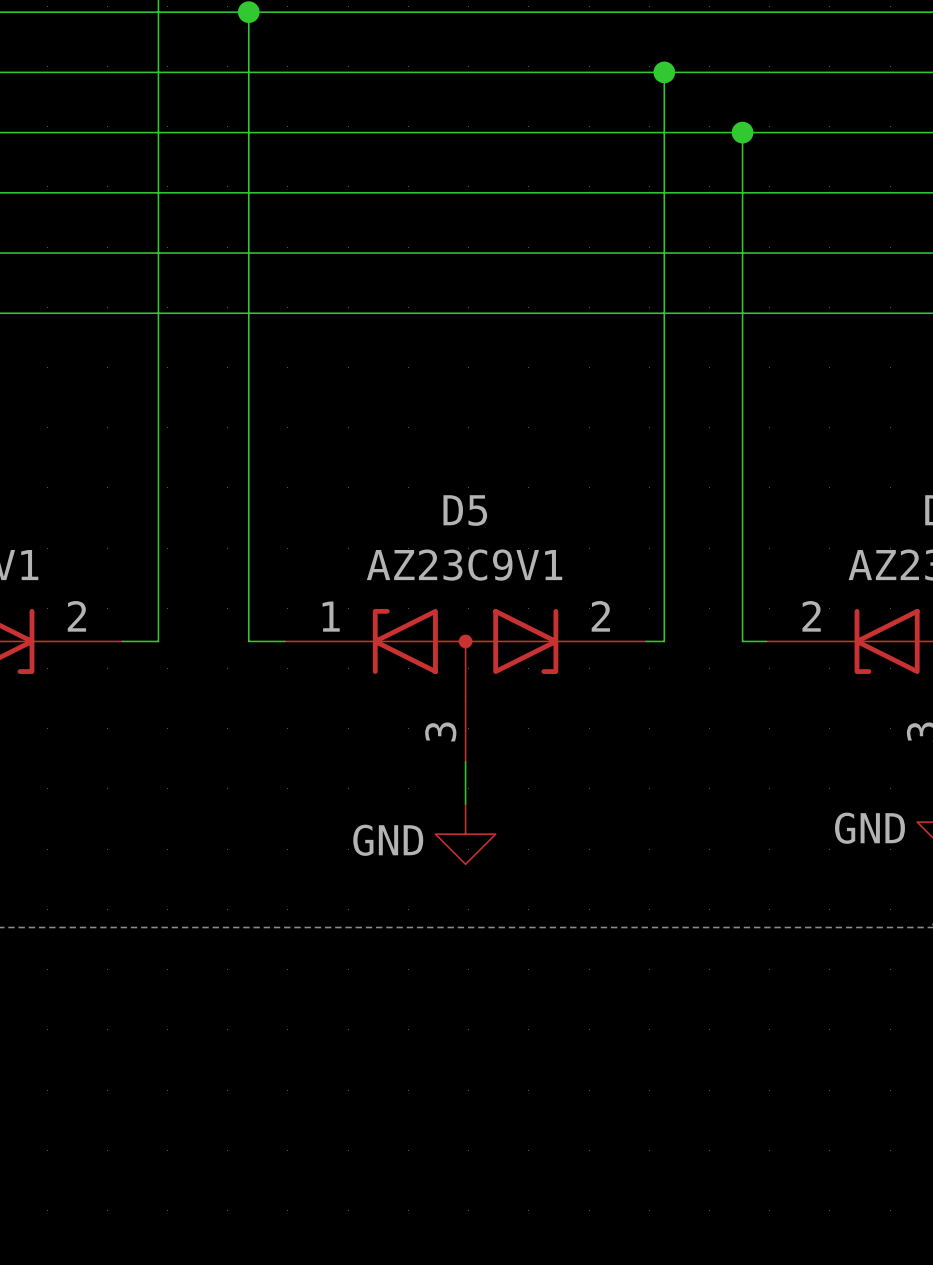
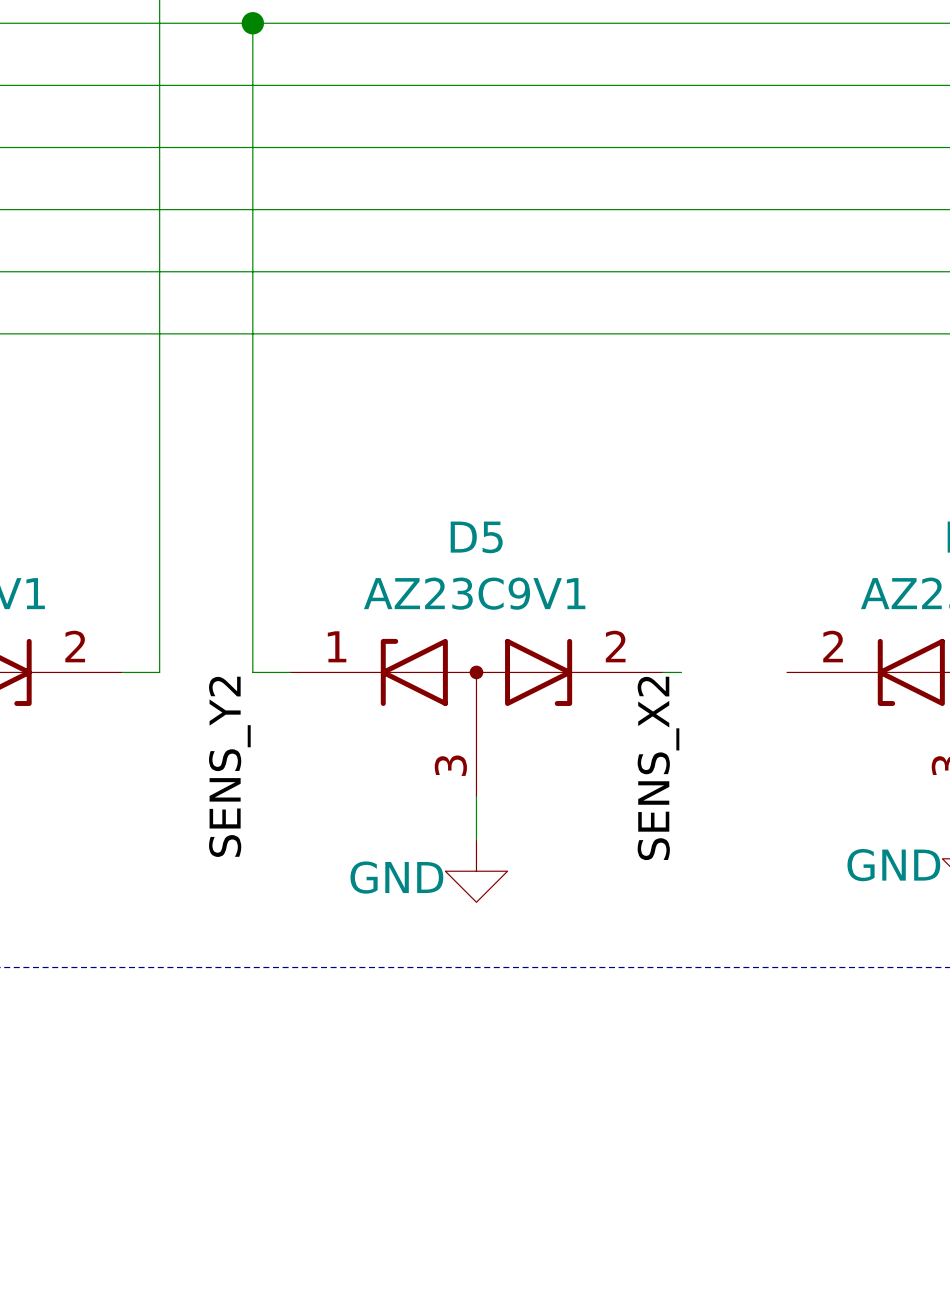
wire: (664, 72) (664, 641) -> none
junction: (664, 72) -> none
wire: (742, 132) (742, 641) (766, 641) -> none
junction: (742, 132) -> none
label: none -> SENS_Y2 (229, 766)
label: none -> SENS_X2 (658, 768)

